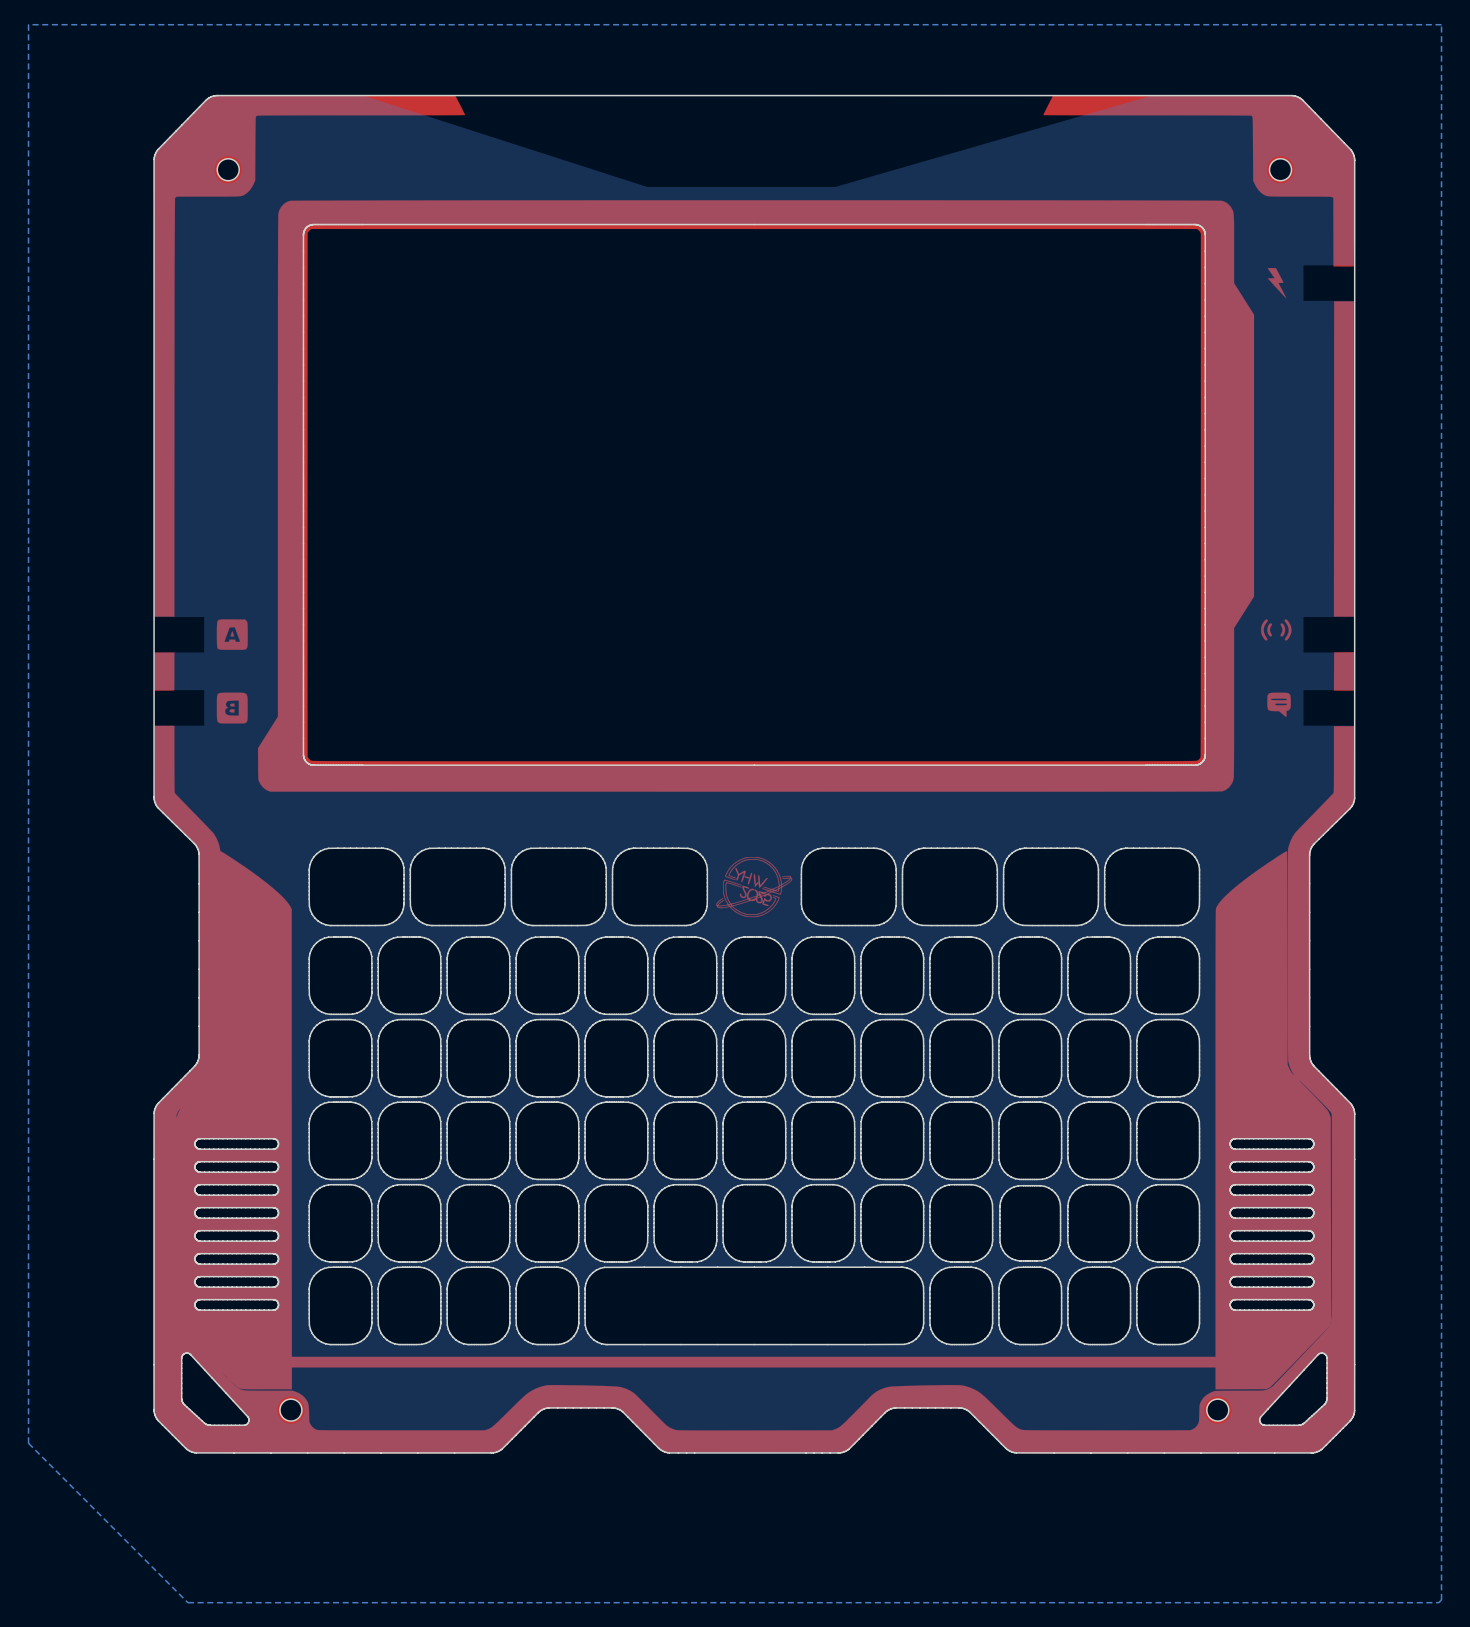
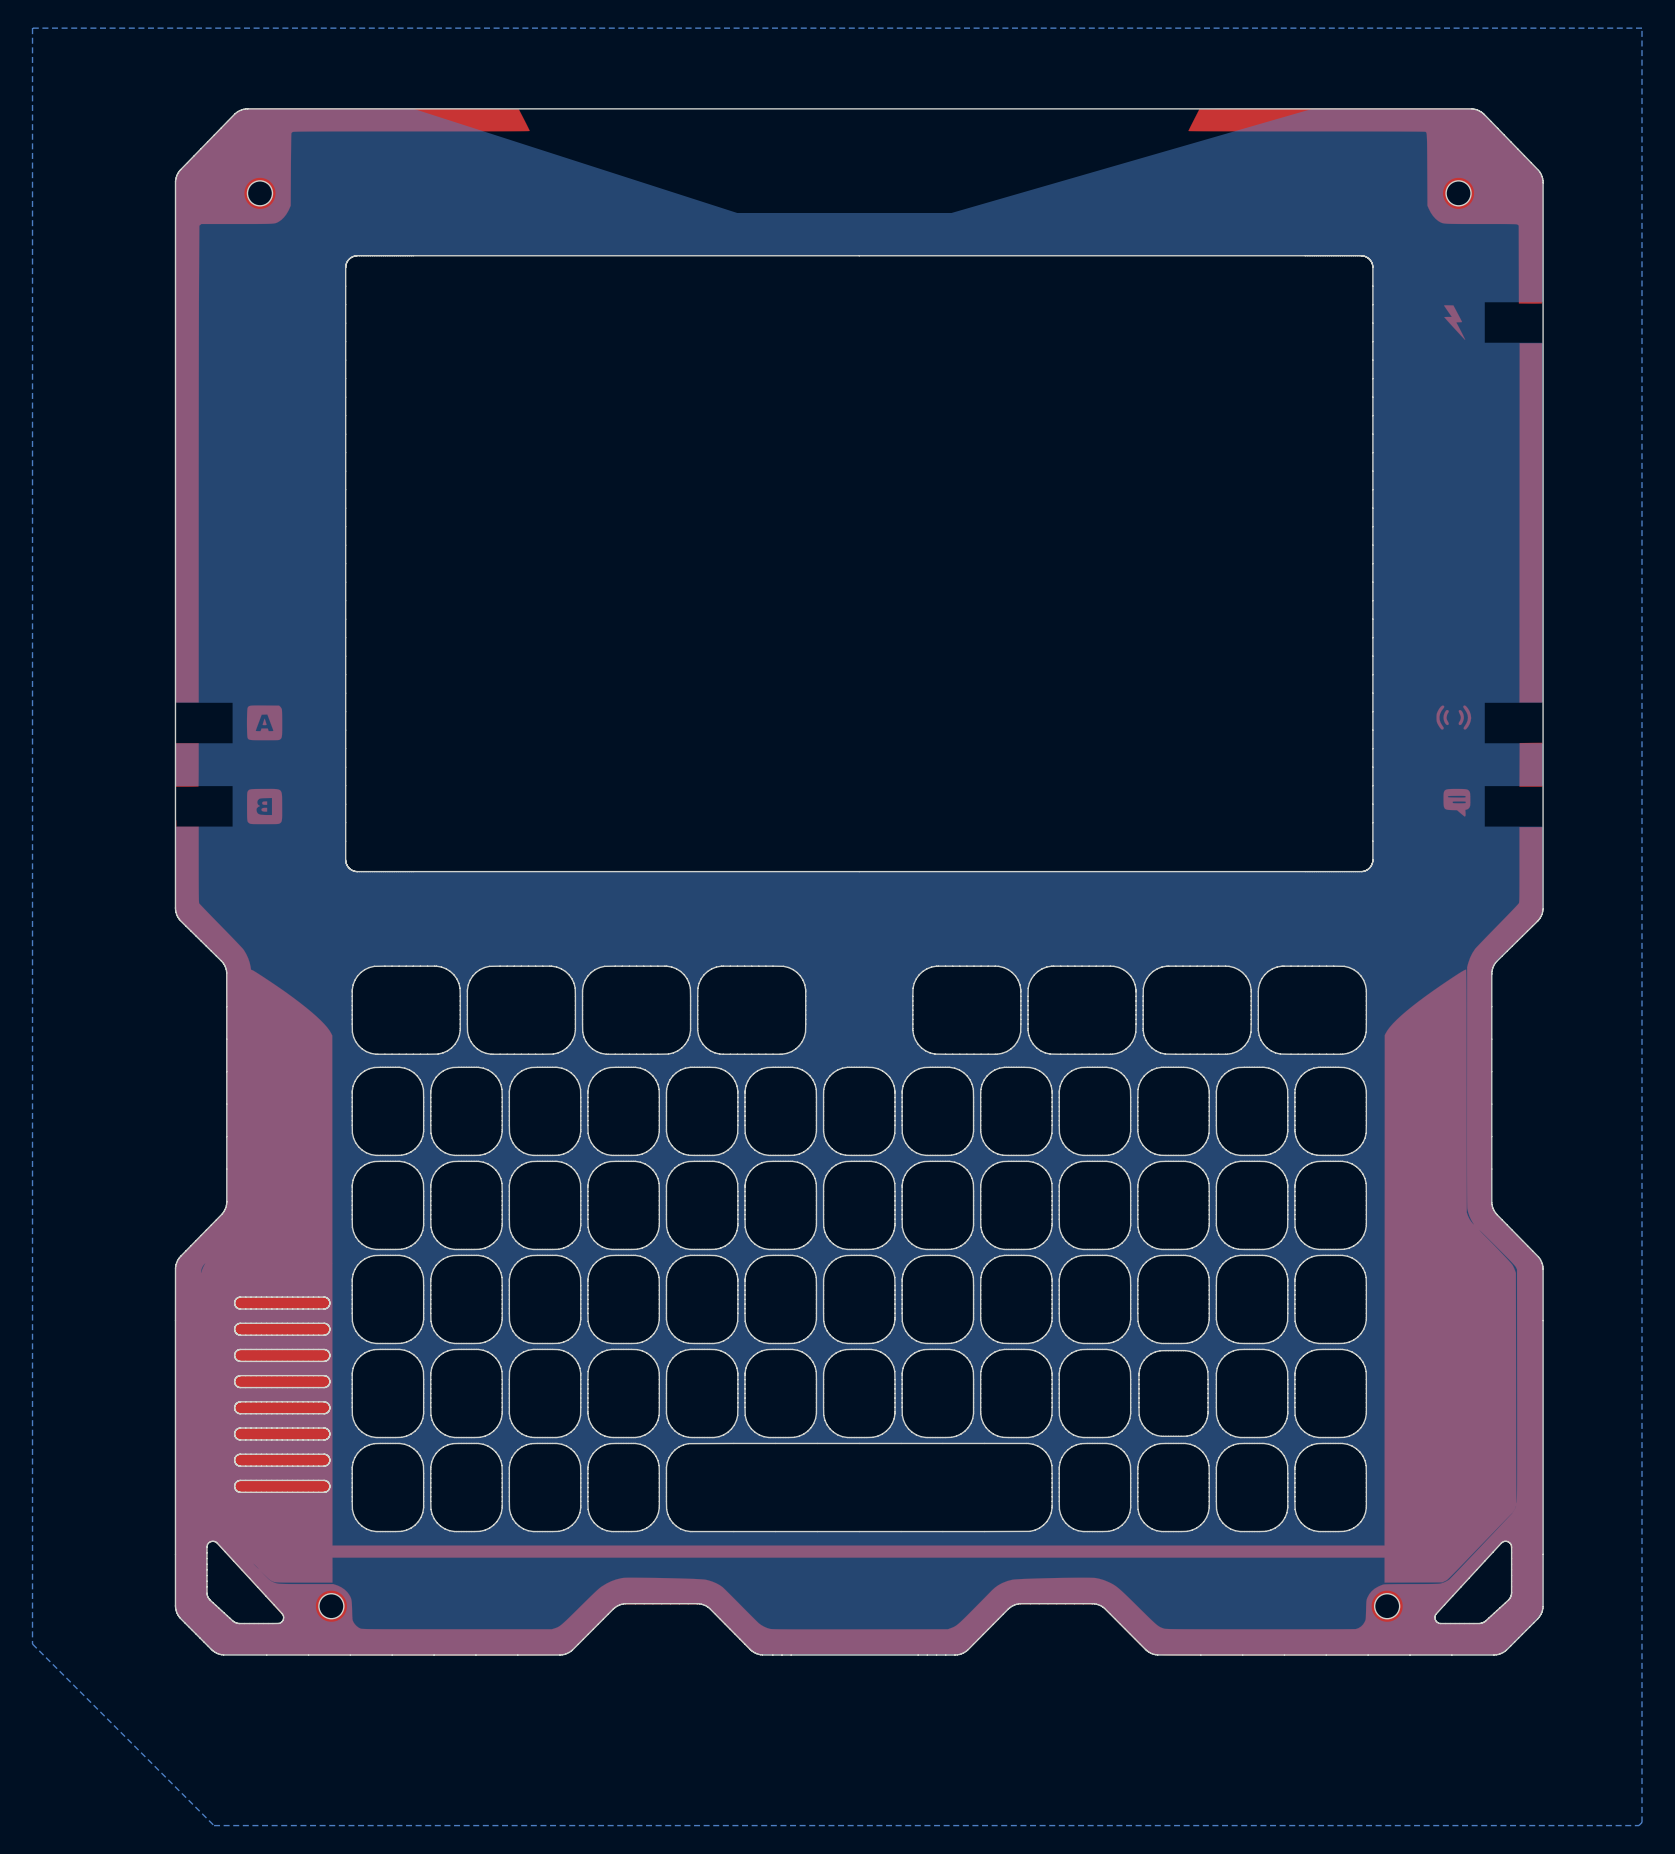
drawing shape: [153, 95, 1356, 1454] -> [174, 108, 1544, 1656]

